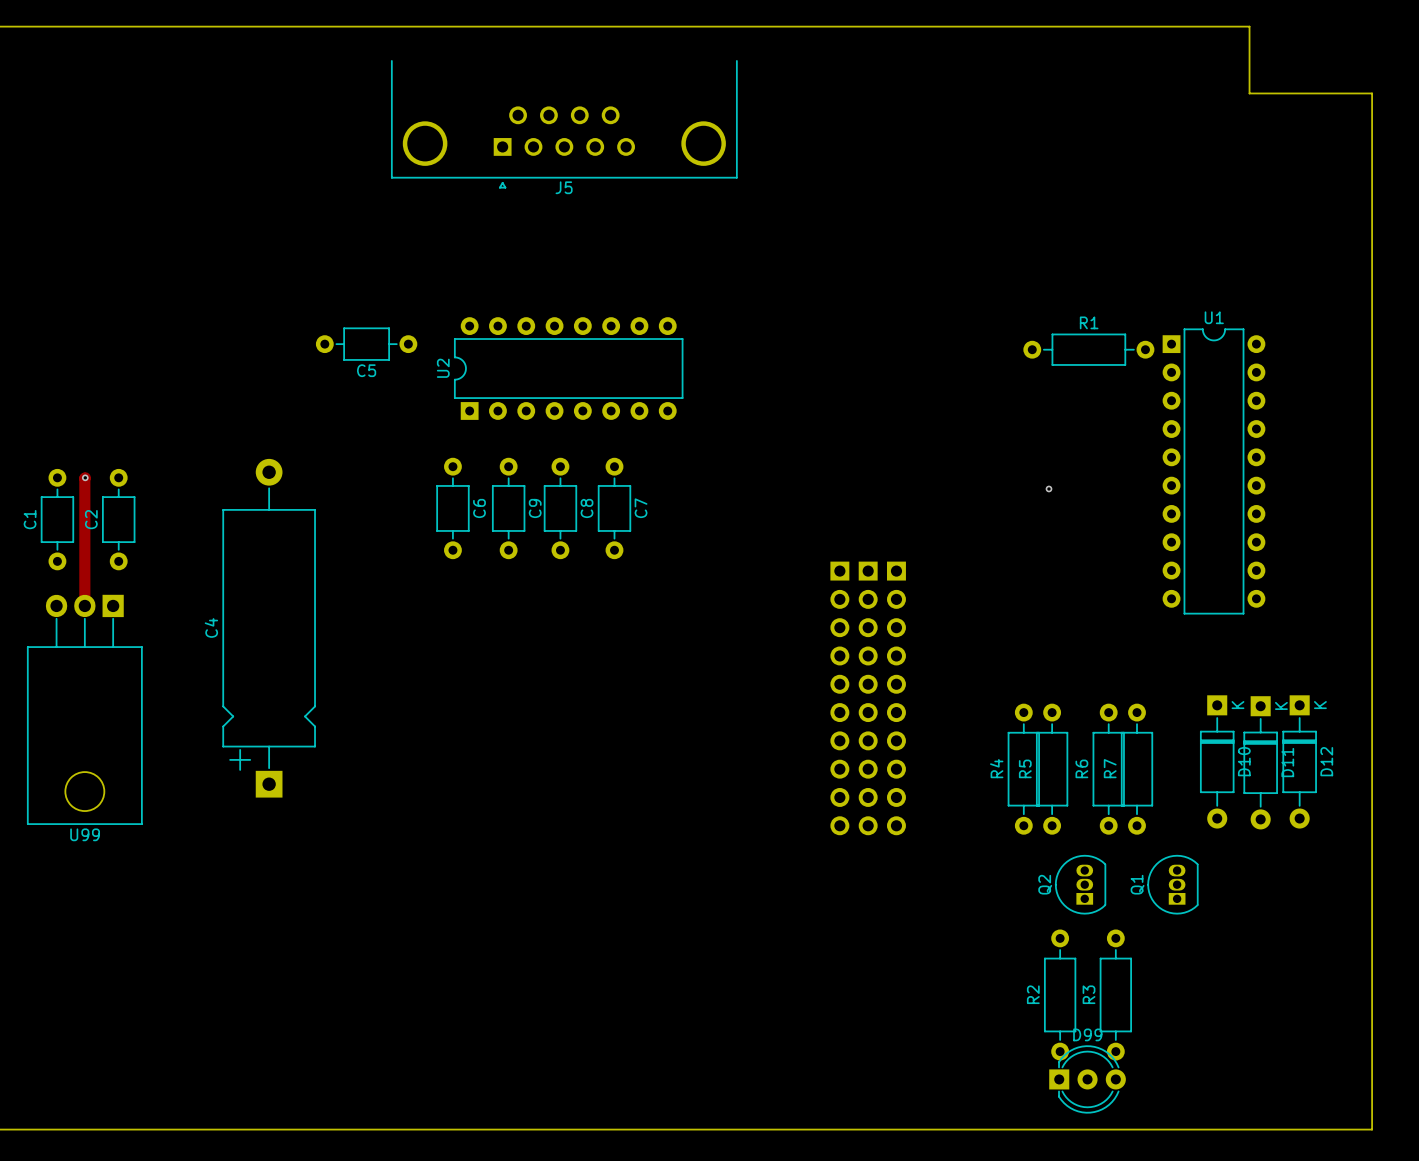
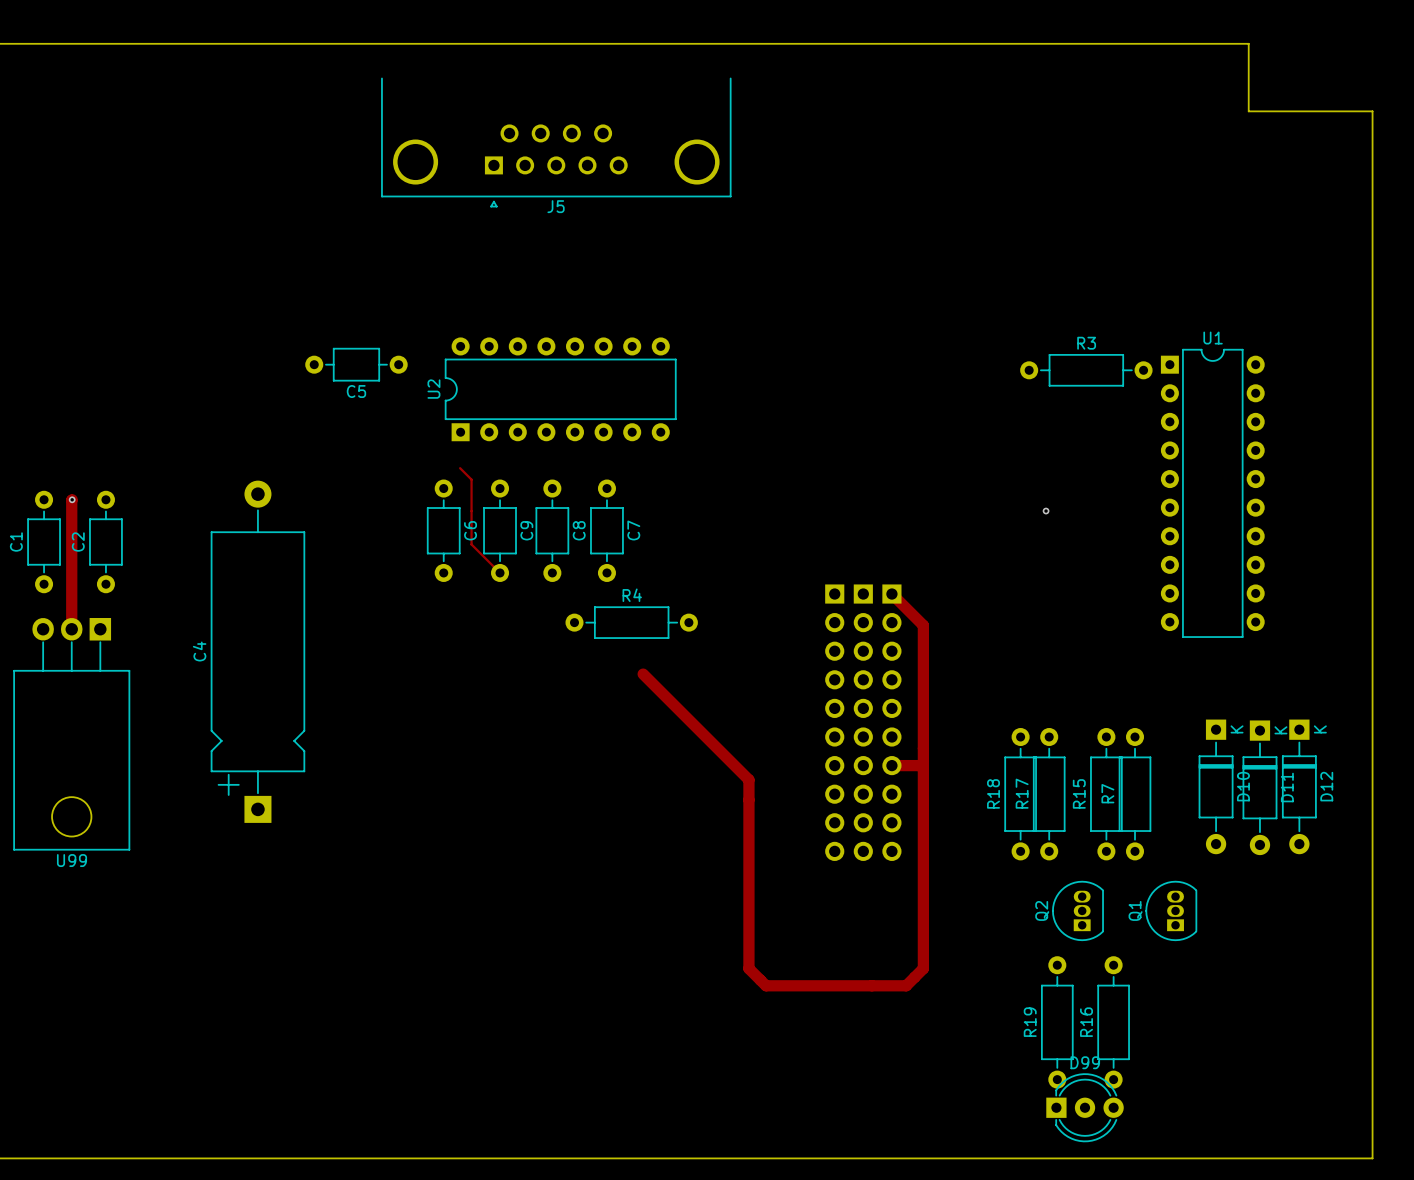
R1 name: R1 (1089, 322) -> R3 (1086, 343)
track: none -> (460, 468) (471, 479) (471, 544) (500, 572)
track: none -> (891, 594) (923, 625) (923, 968) (906, 985) (766, 985) (748, 968) (748, 779) (643, 674)
R4: none -> (631, 622)
track: none -> (891, 765) (923, 765)
R4 name: R4 (996, 768) -> R18 (993, 793)
R5 name: R5 (1025, 768) -> R17 (1022, 793)
R6 name: R6 (1081, 768) -> R15 (1079, 793)
R2 name: R2 (1033, 994) -> R19 (1030, 1022)
R3 name: R3 (1089, 994) -> R16 (1086, 1022)

